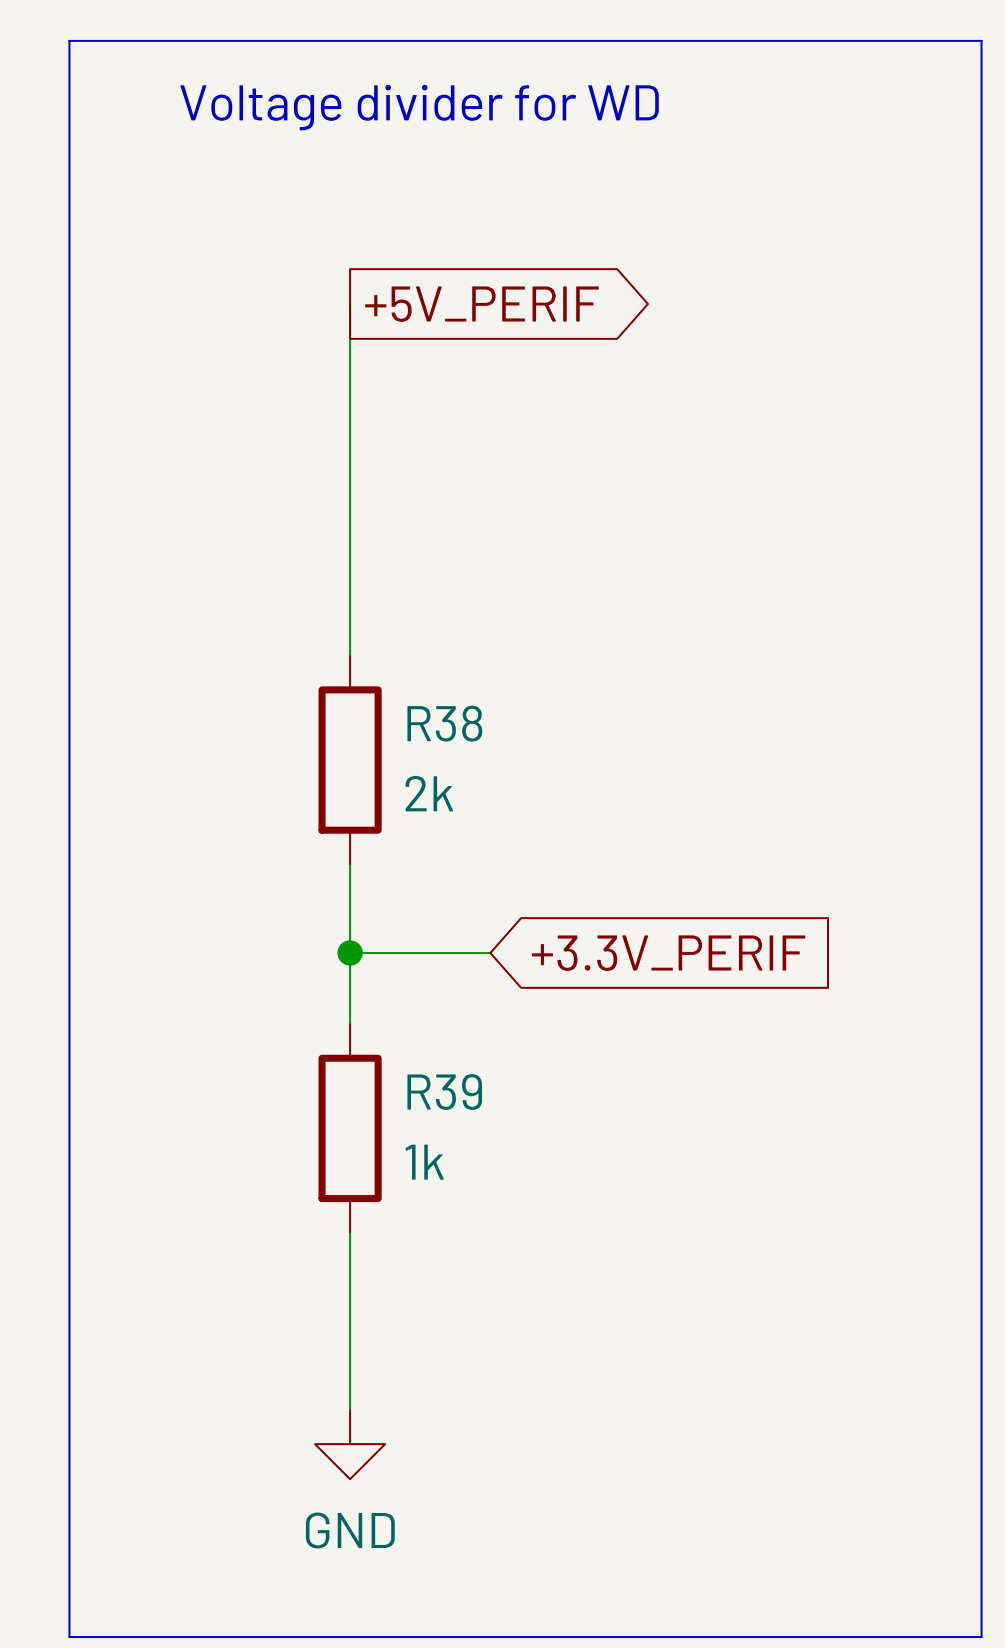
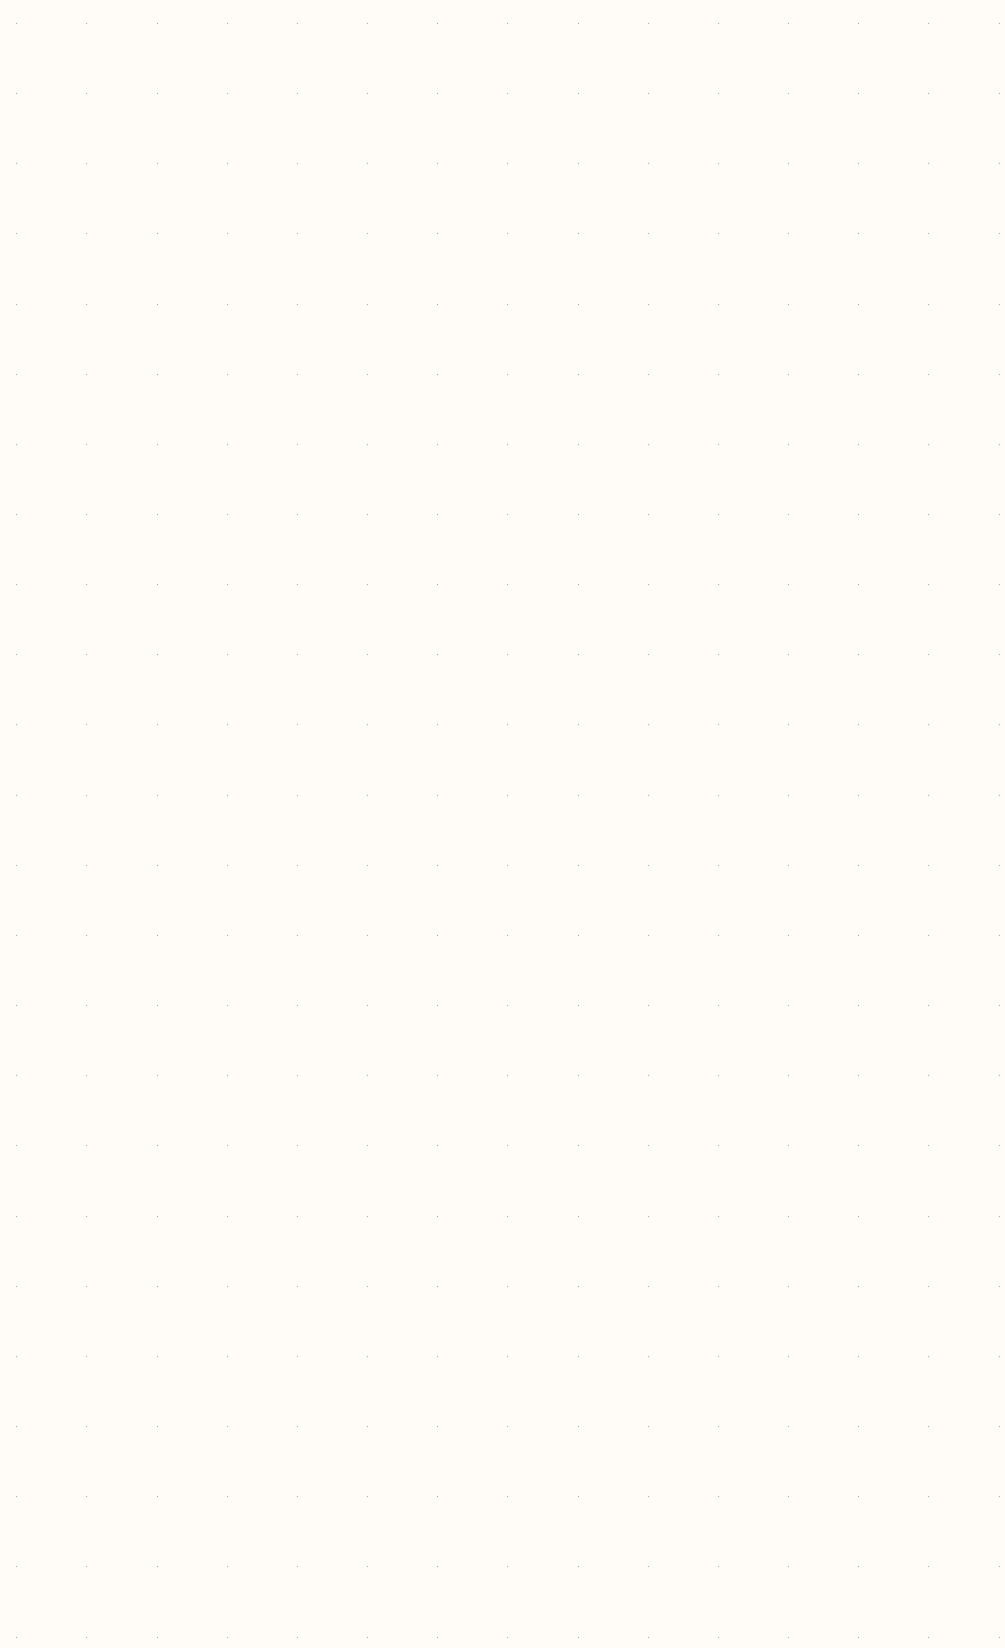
line: (69, 40) (981, 40) (981, 1637) (69, 1637) (69, 40) -> none
text: Voltage divider for WD (419, 107) -> none
wire: (350, 304) (350, 654) -> none
global label: +5V_PERIF (482, 304) -> none
R38: 2k (350, 760) -> none
wire: (350, 865) (350, 1023) -> none
wire: (350, 952) (490, 952) -> none
junction: (350, 952) -> none
global label: +3.3V_PERIF (668, 953) -> none
R39: 1k (350, 1128) -> none
wire: (350, 1233) (350, 1409) -> none
power symbol: GND (350, 1444) -> none

